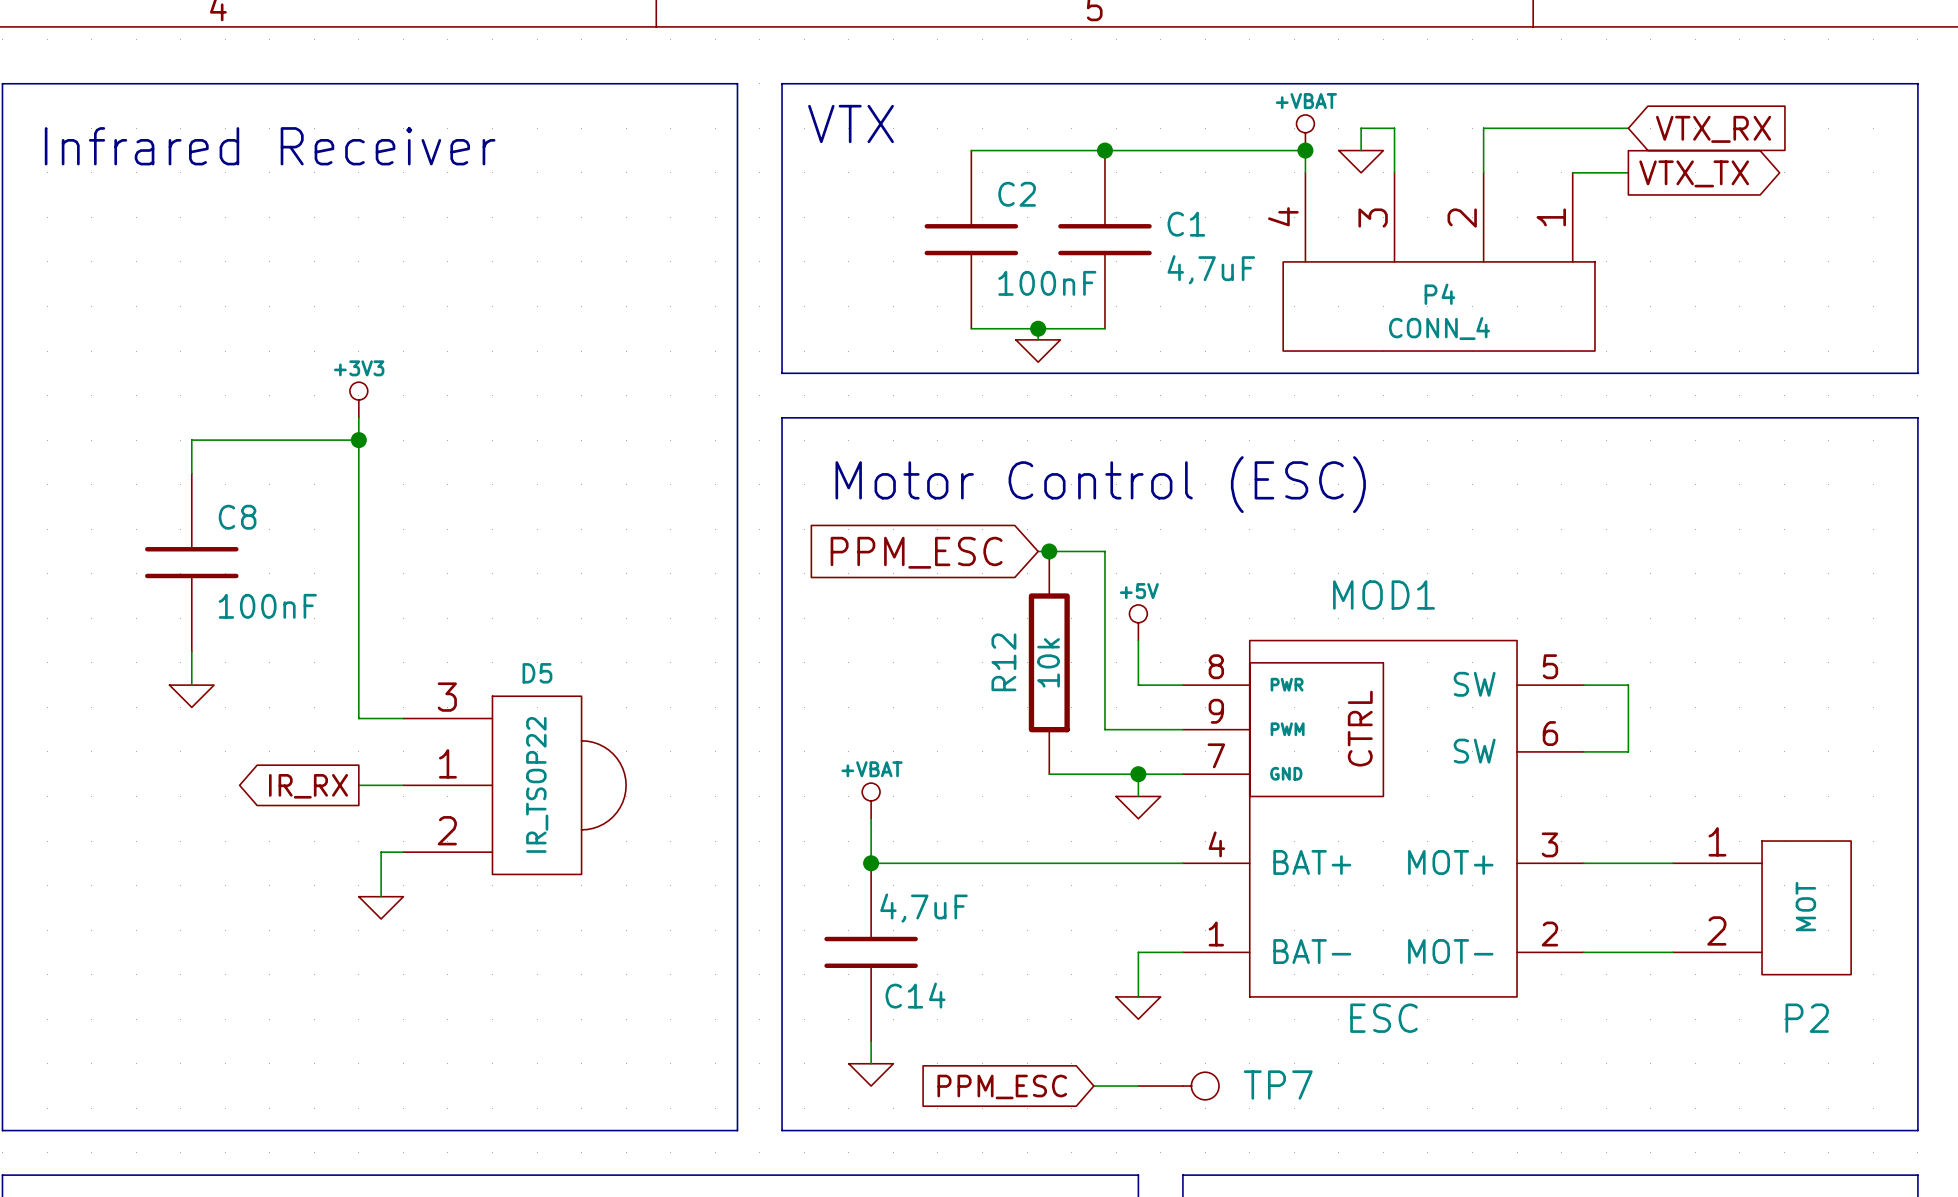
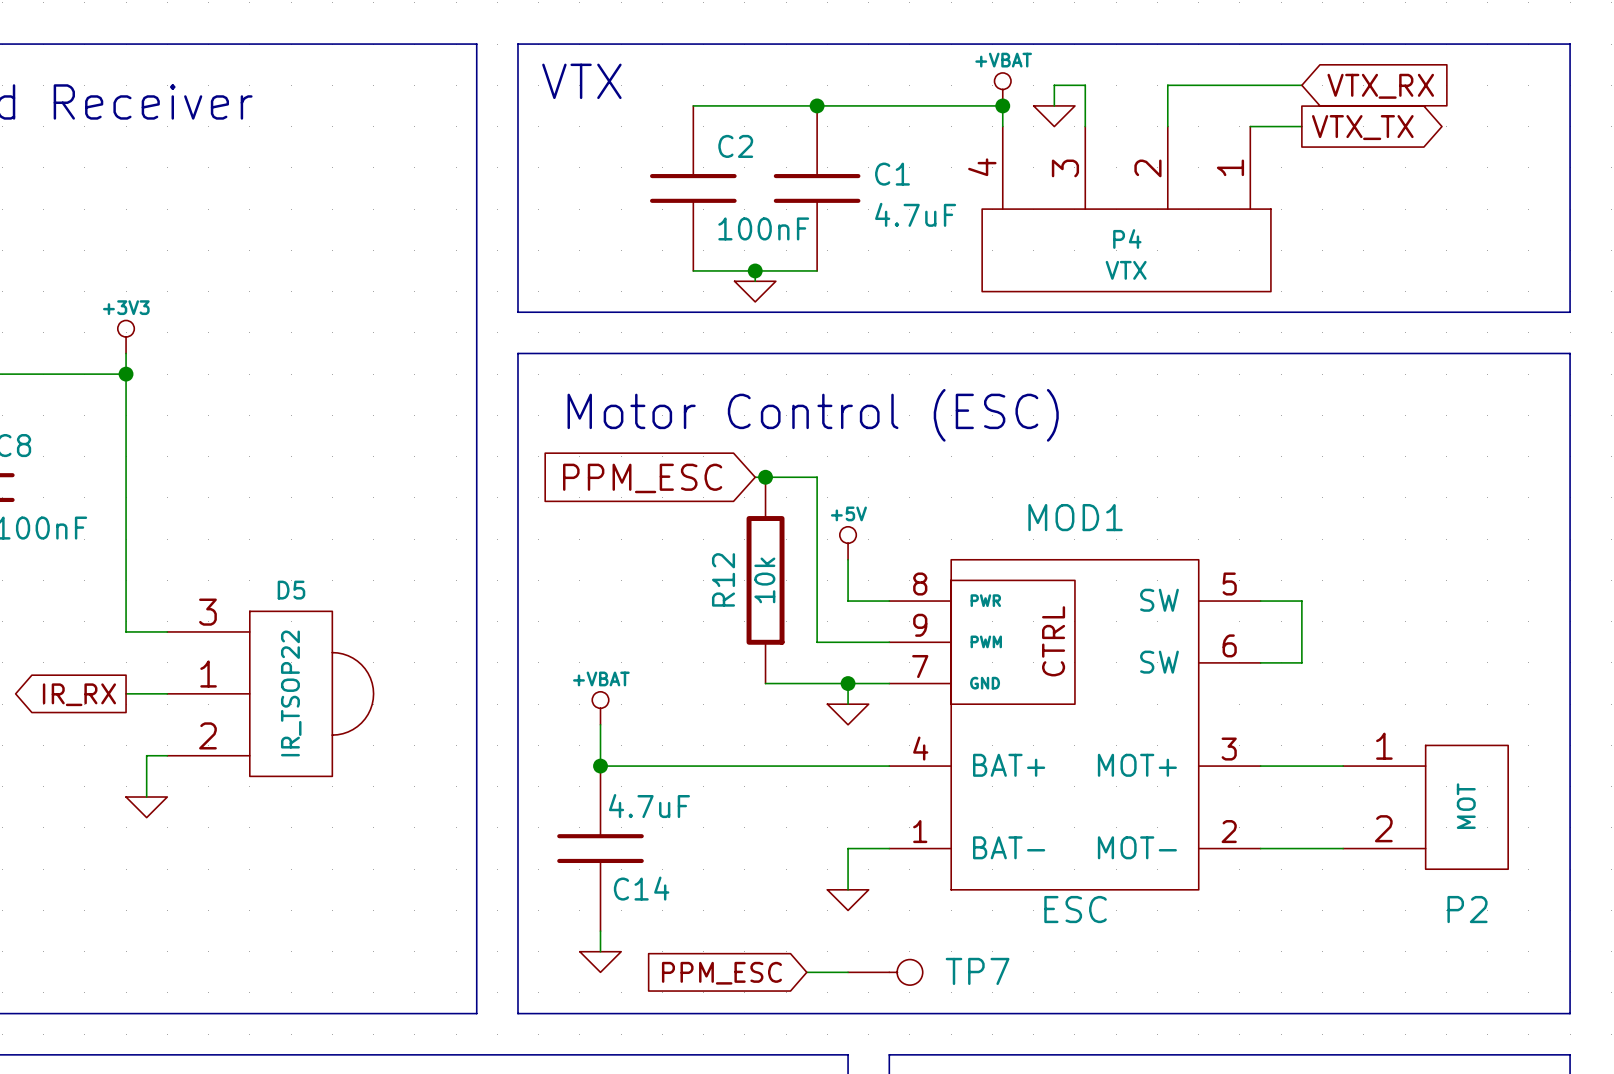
C1 value: 4,7uF (1211, 269) -> 4.7uF (915, 214)
P4 value: CONN_4 (1439, 328) -> VTX (1126, 270)
C14 value: 4,7uF (923, 908) -> 4.7uF (649, 806)

